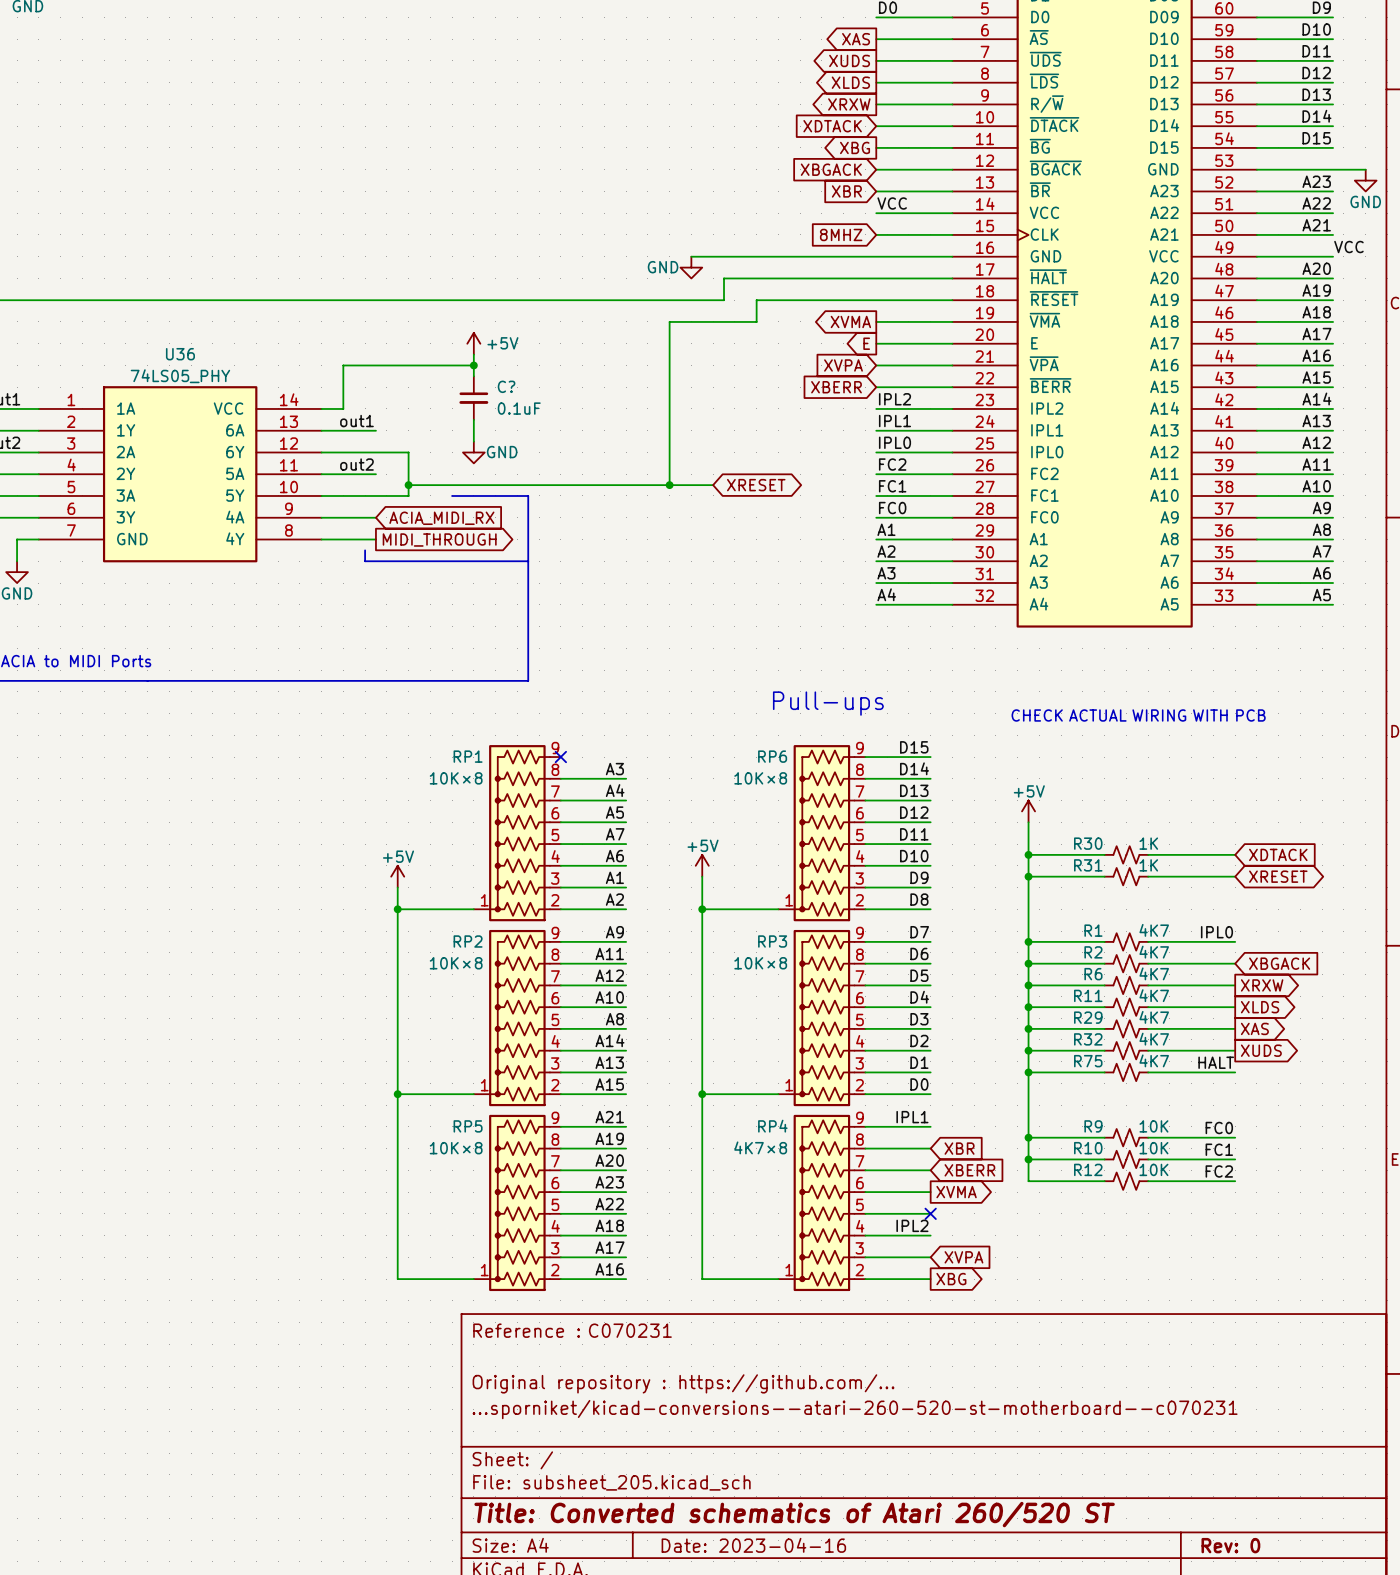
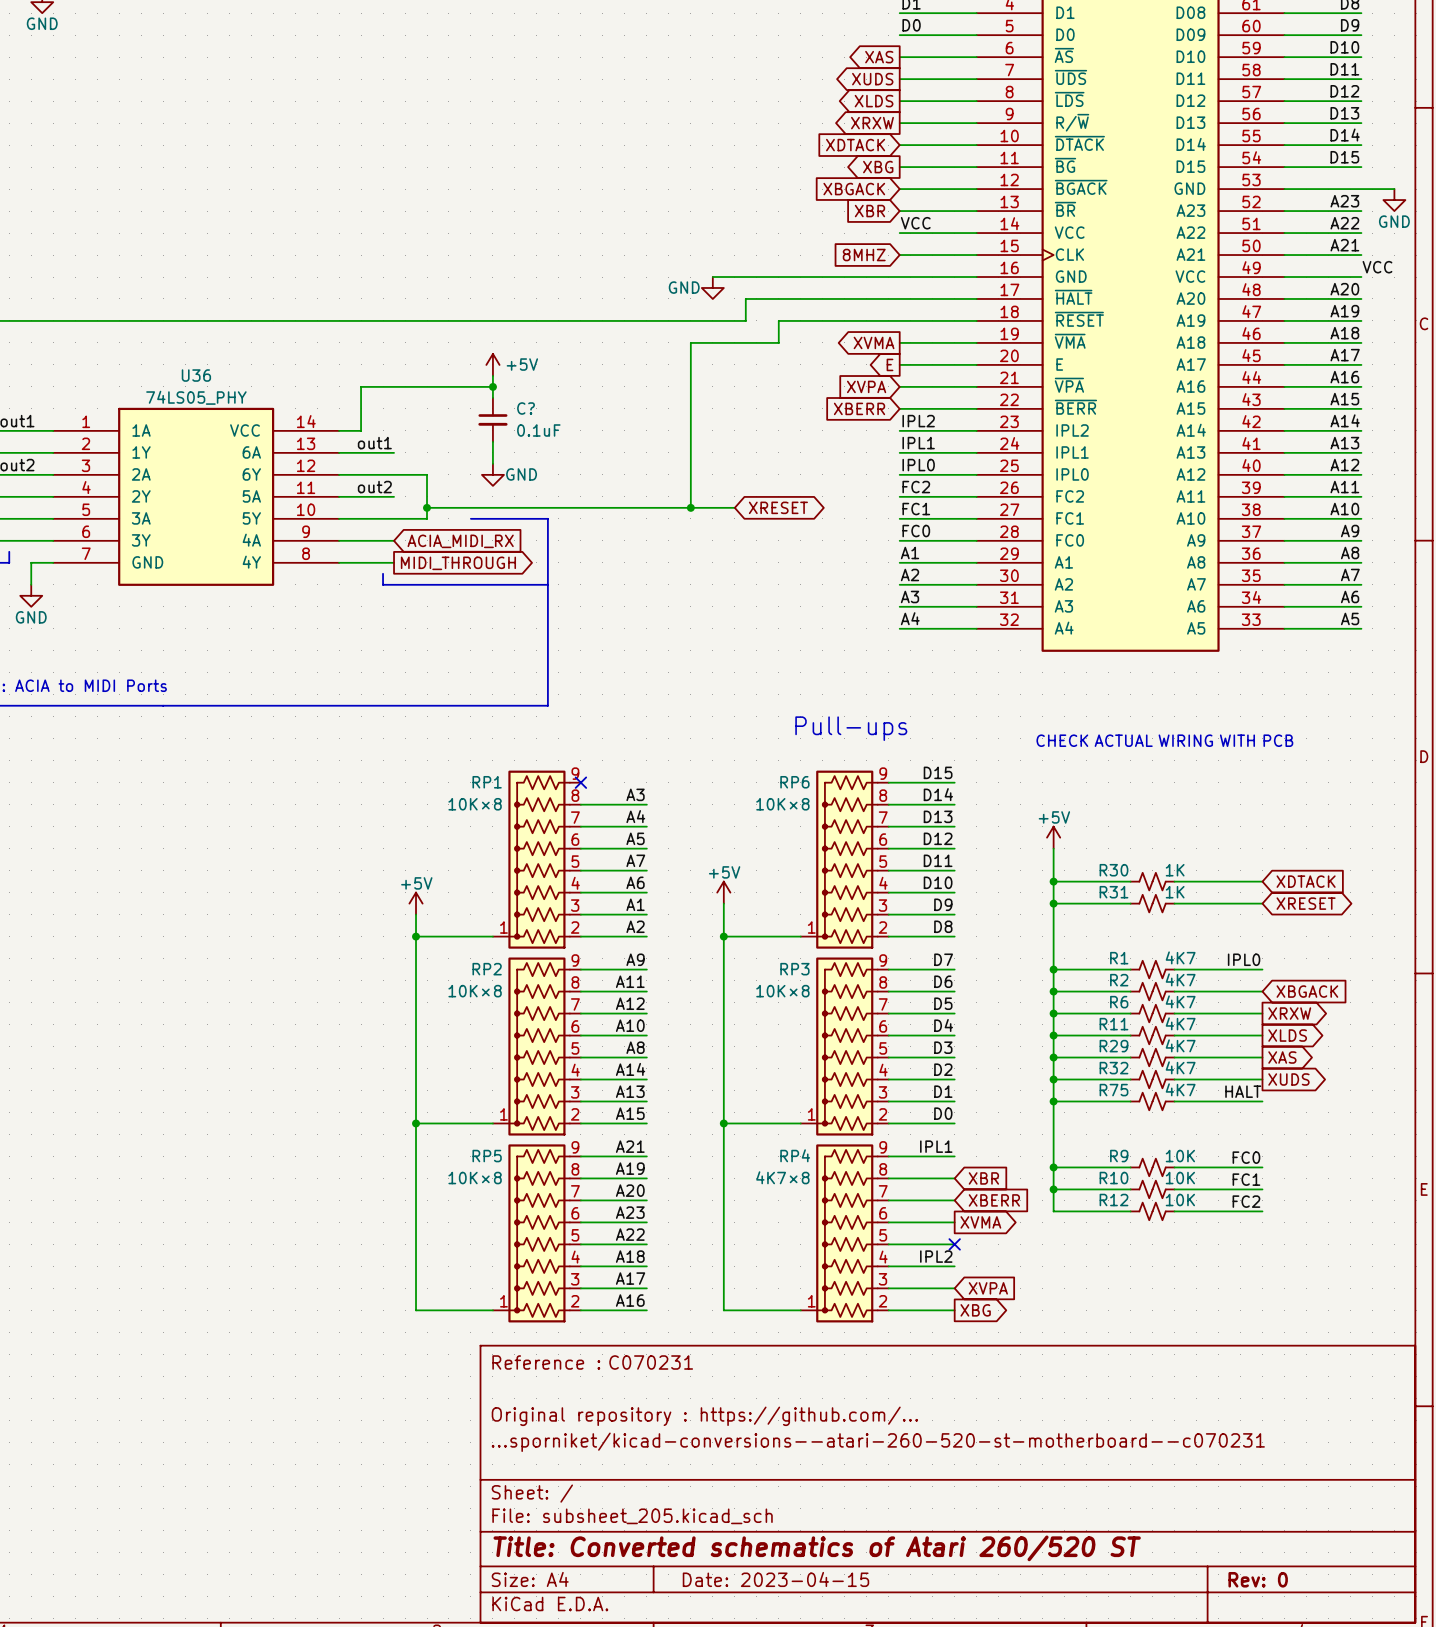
title block: Date: 2023-04-16 (753, 1545) -> Date: 2023-04-15 (775, 1579)

